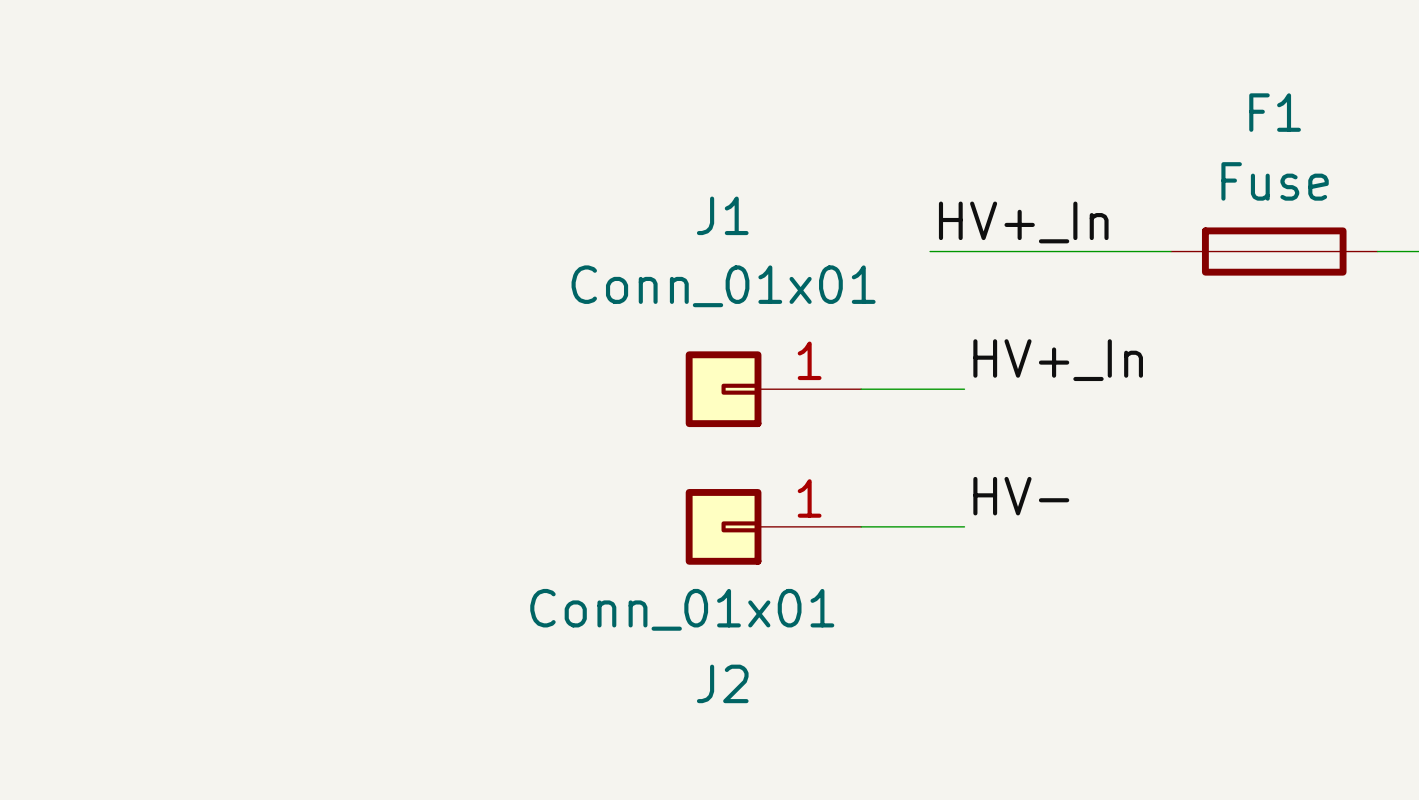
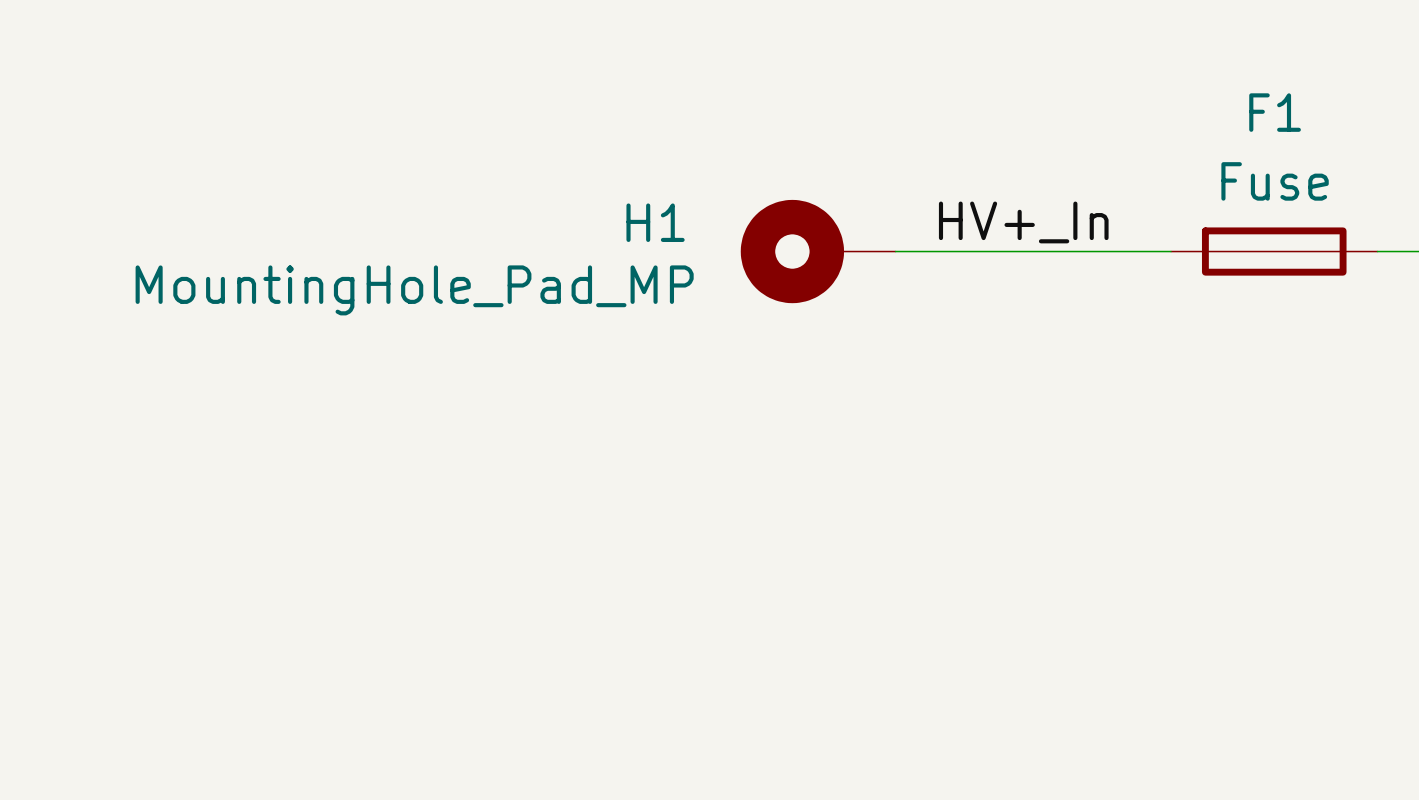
H1: none -> MountingHole_Pad_MP (818, 251)
wire: none -> (895, 251) (930, 251)
label: HV+_In (1058, 360) -> none
J1: Conn_01x01 (773, 389) -> none
wire: (861, 389) (964, 389) -> none
label: HV- (1021, 496) -> none
J2: Conn_01x01 (773, 526) -> none
wire: (861, 526) (964, 526) -> none

